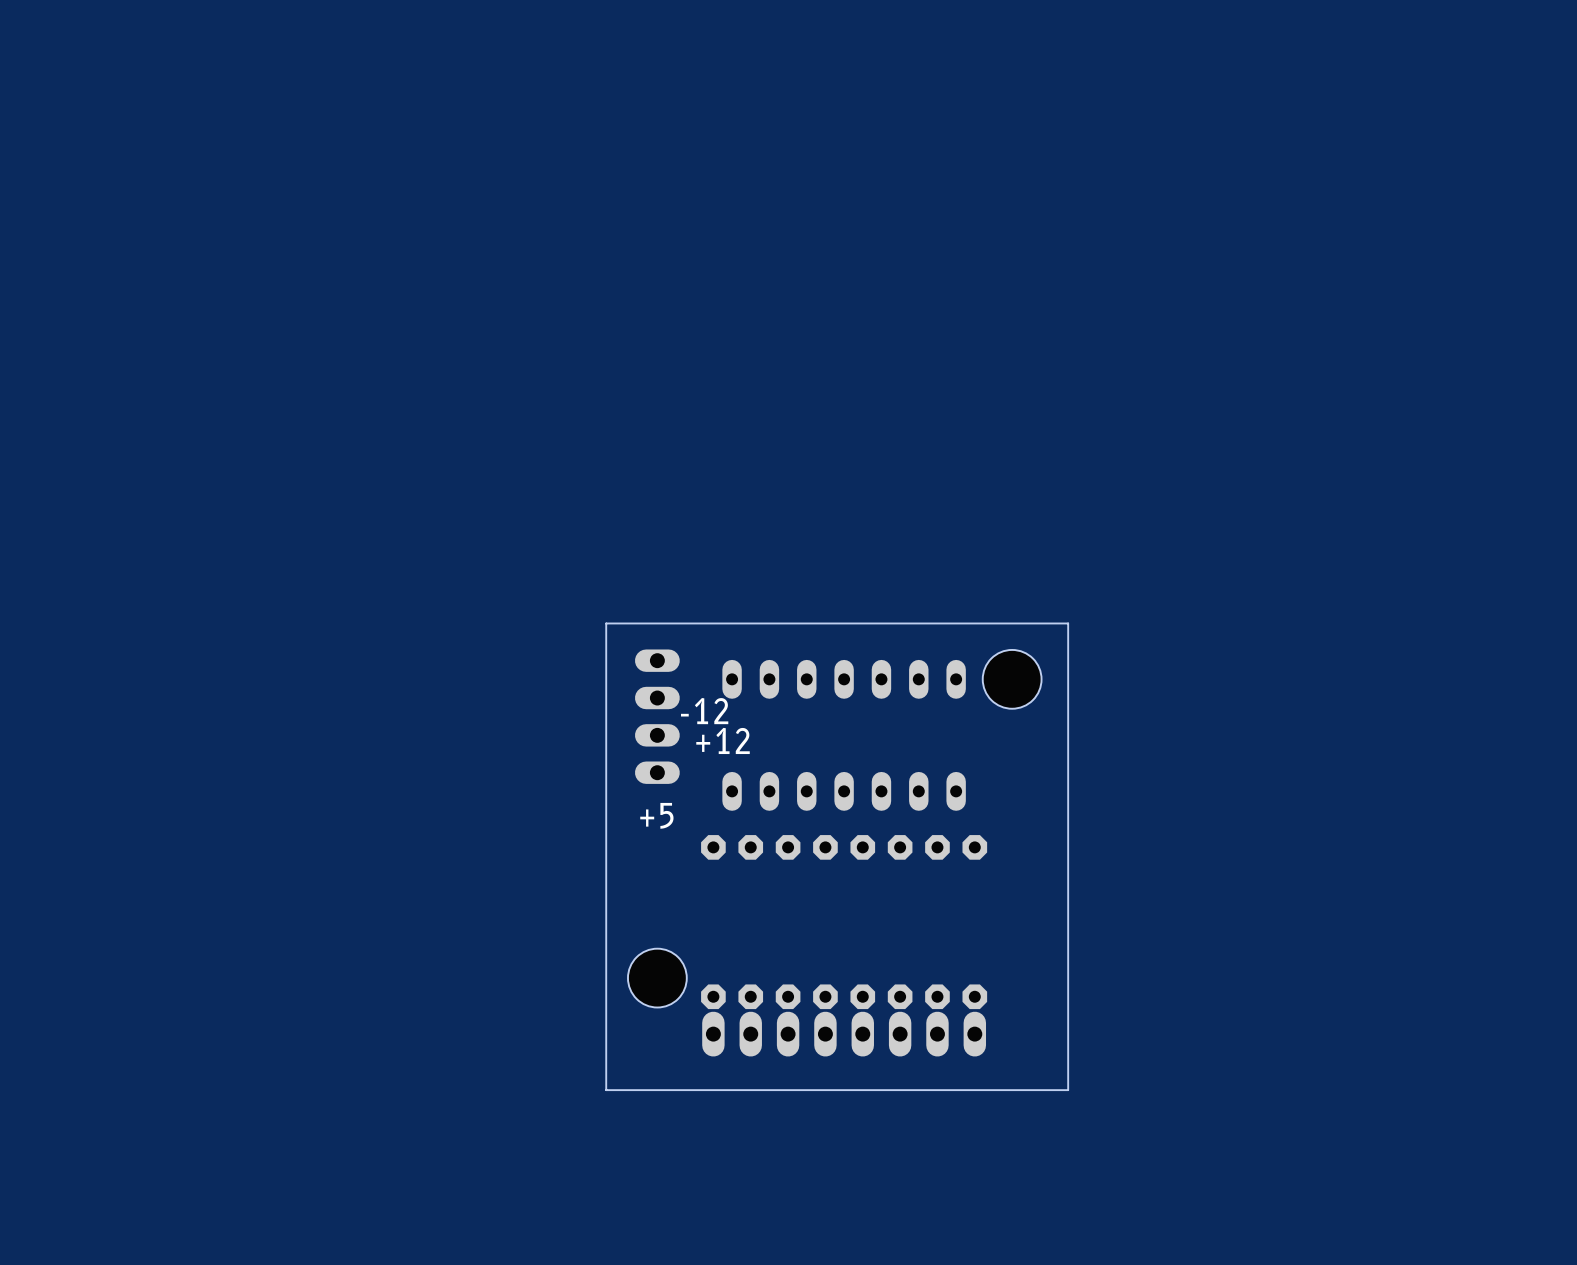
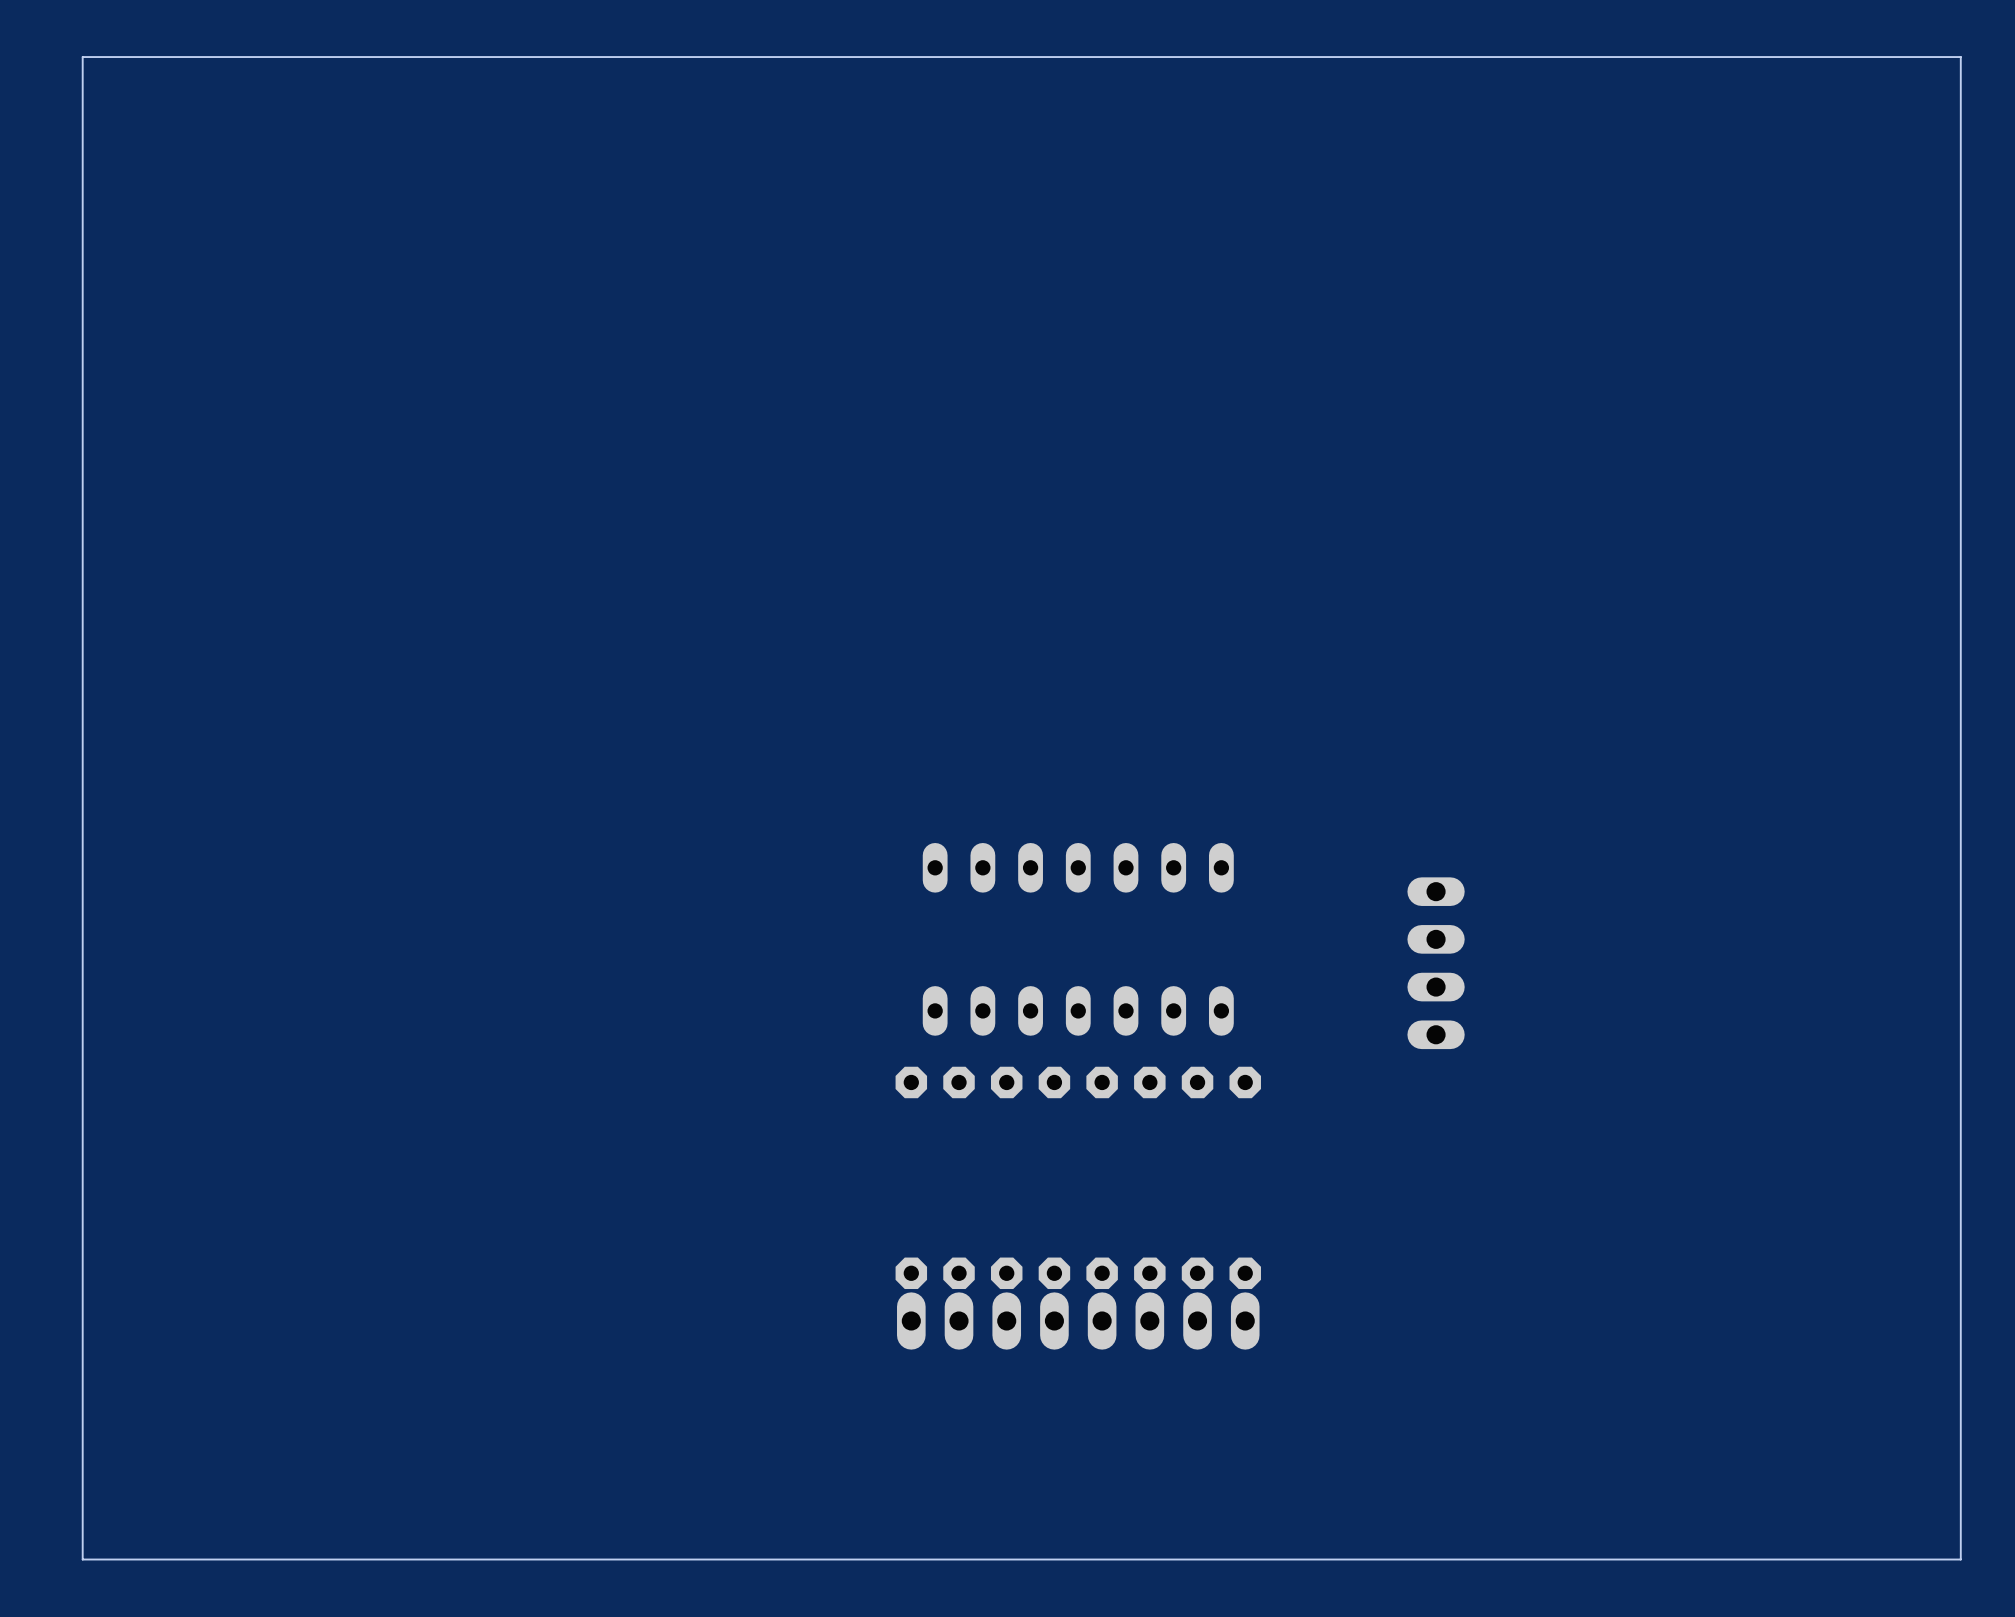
board edge: none -> (1960, 57) (82, 57) (82, 1559) (1960, 1559) (1960, 57)
board edge: (1068, 623) (606, 623) (606, 1090) (1068, 1090) (1068, 623) -> none
hole: (1012, 679) -> none
text: -12 (704, 711) -> none
part: (657, 716) -> none
text: +12 (723, 740) -> none
part: none -> (1436, 963)
text: +5 (656, 815) -> none
hole: (657, 978) -> none

